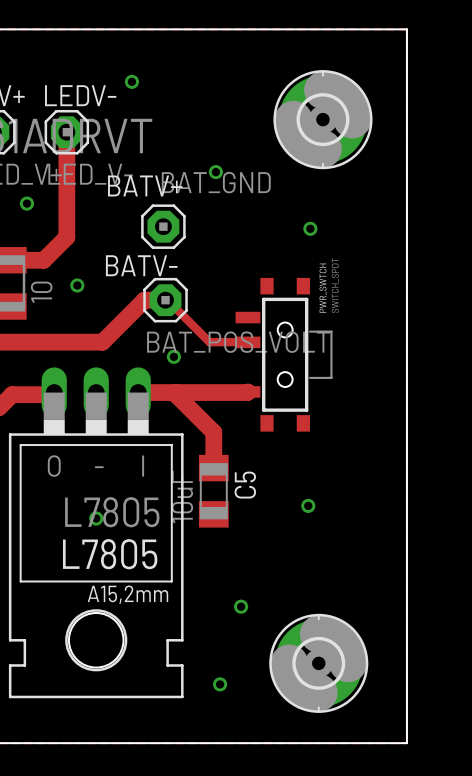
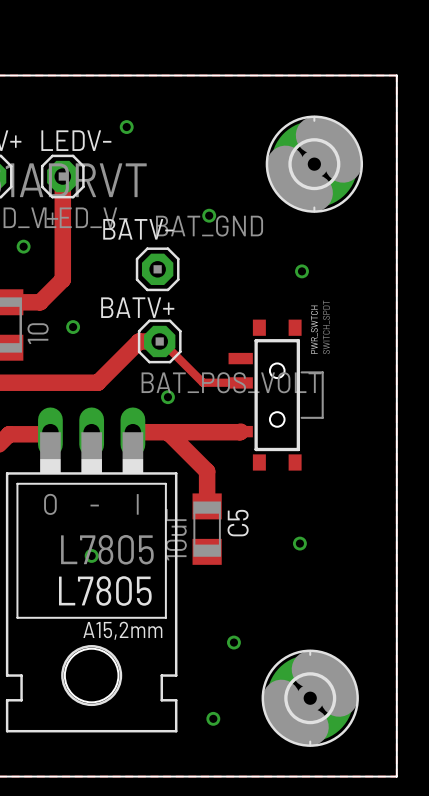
BATV+ name: BATV+ (145, 185) -> BATV- (138, 229)
BATV- name: BATV- (141, 265) -> BATV+ (137, 307)

